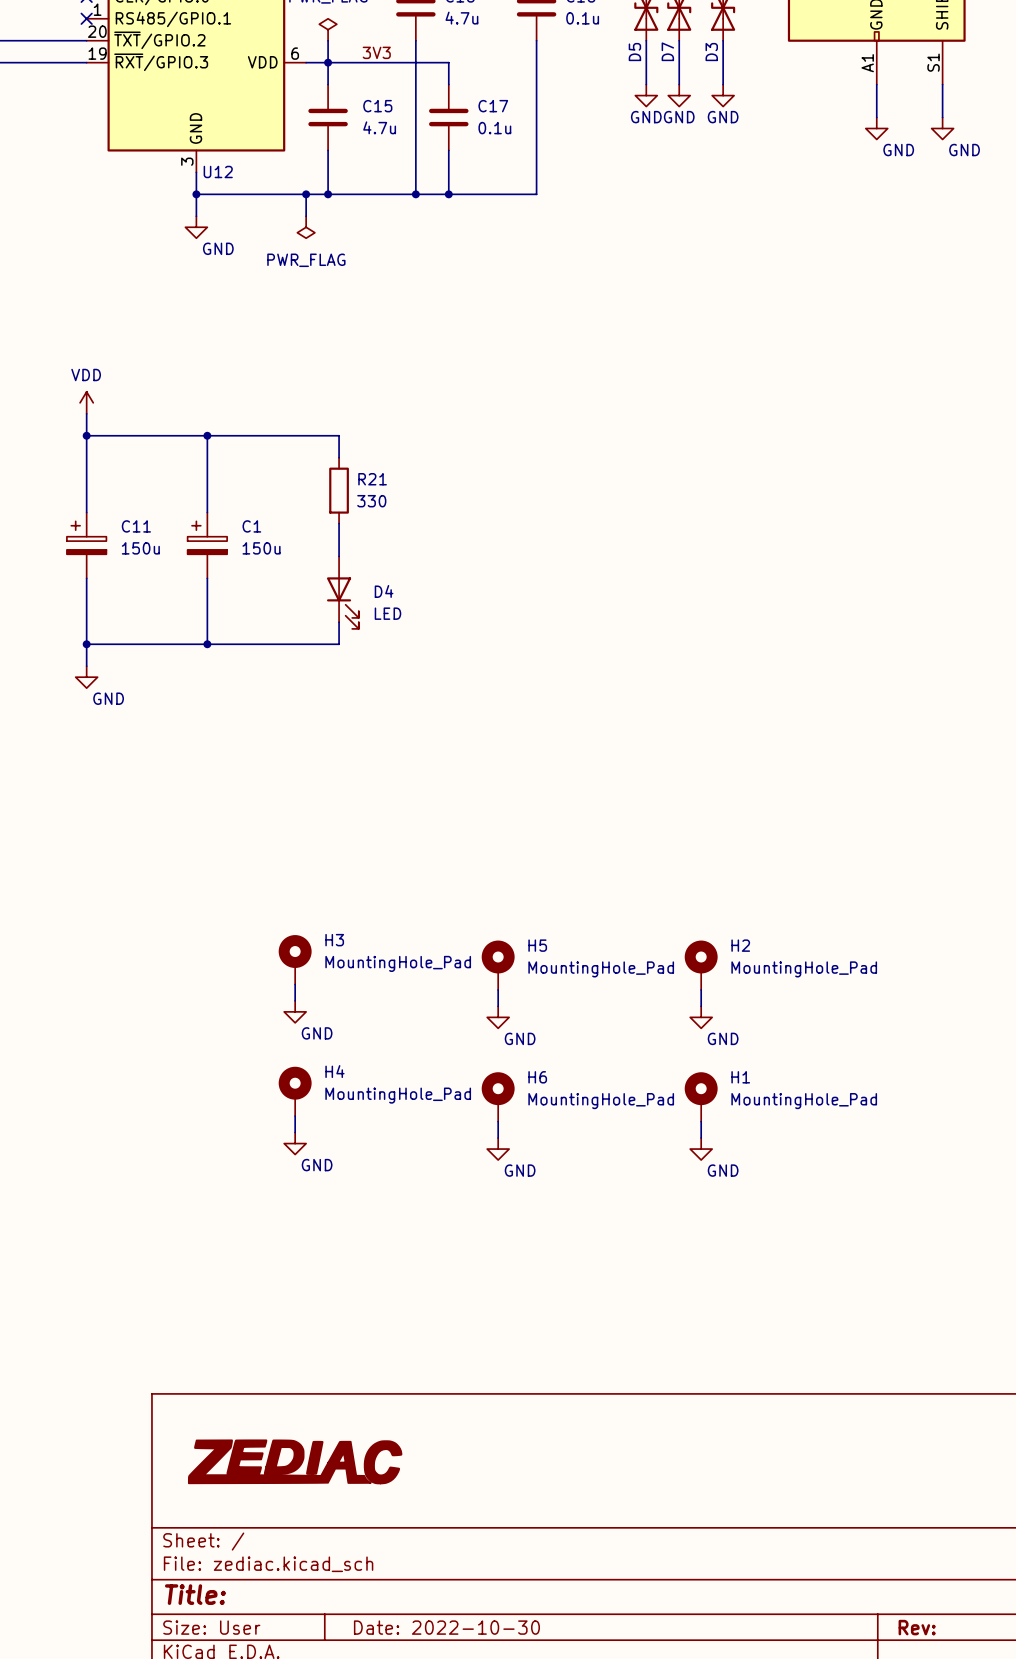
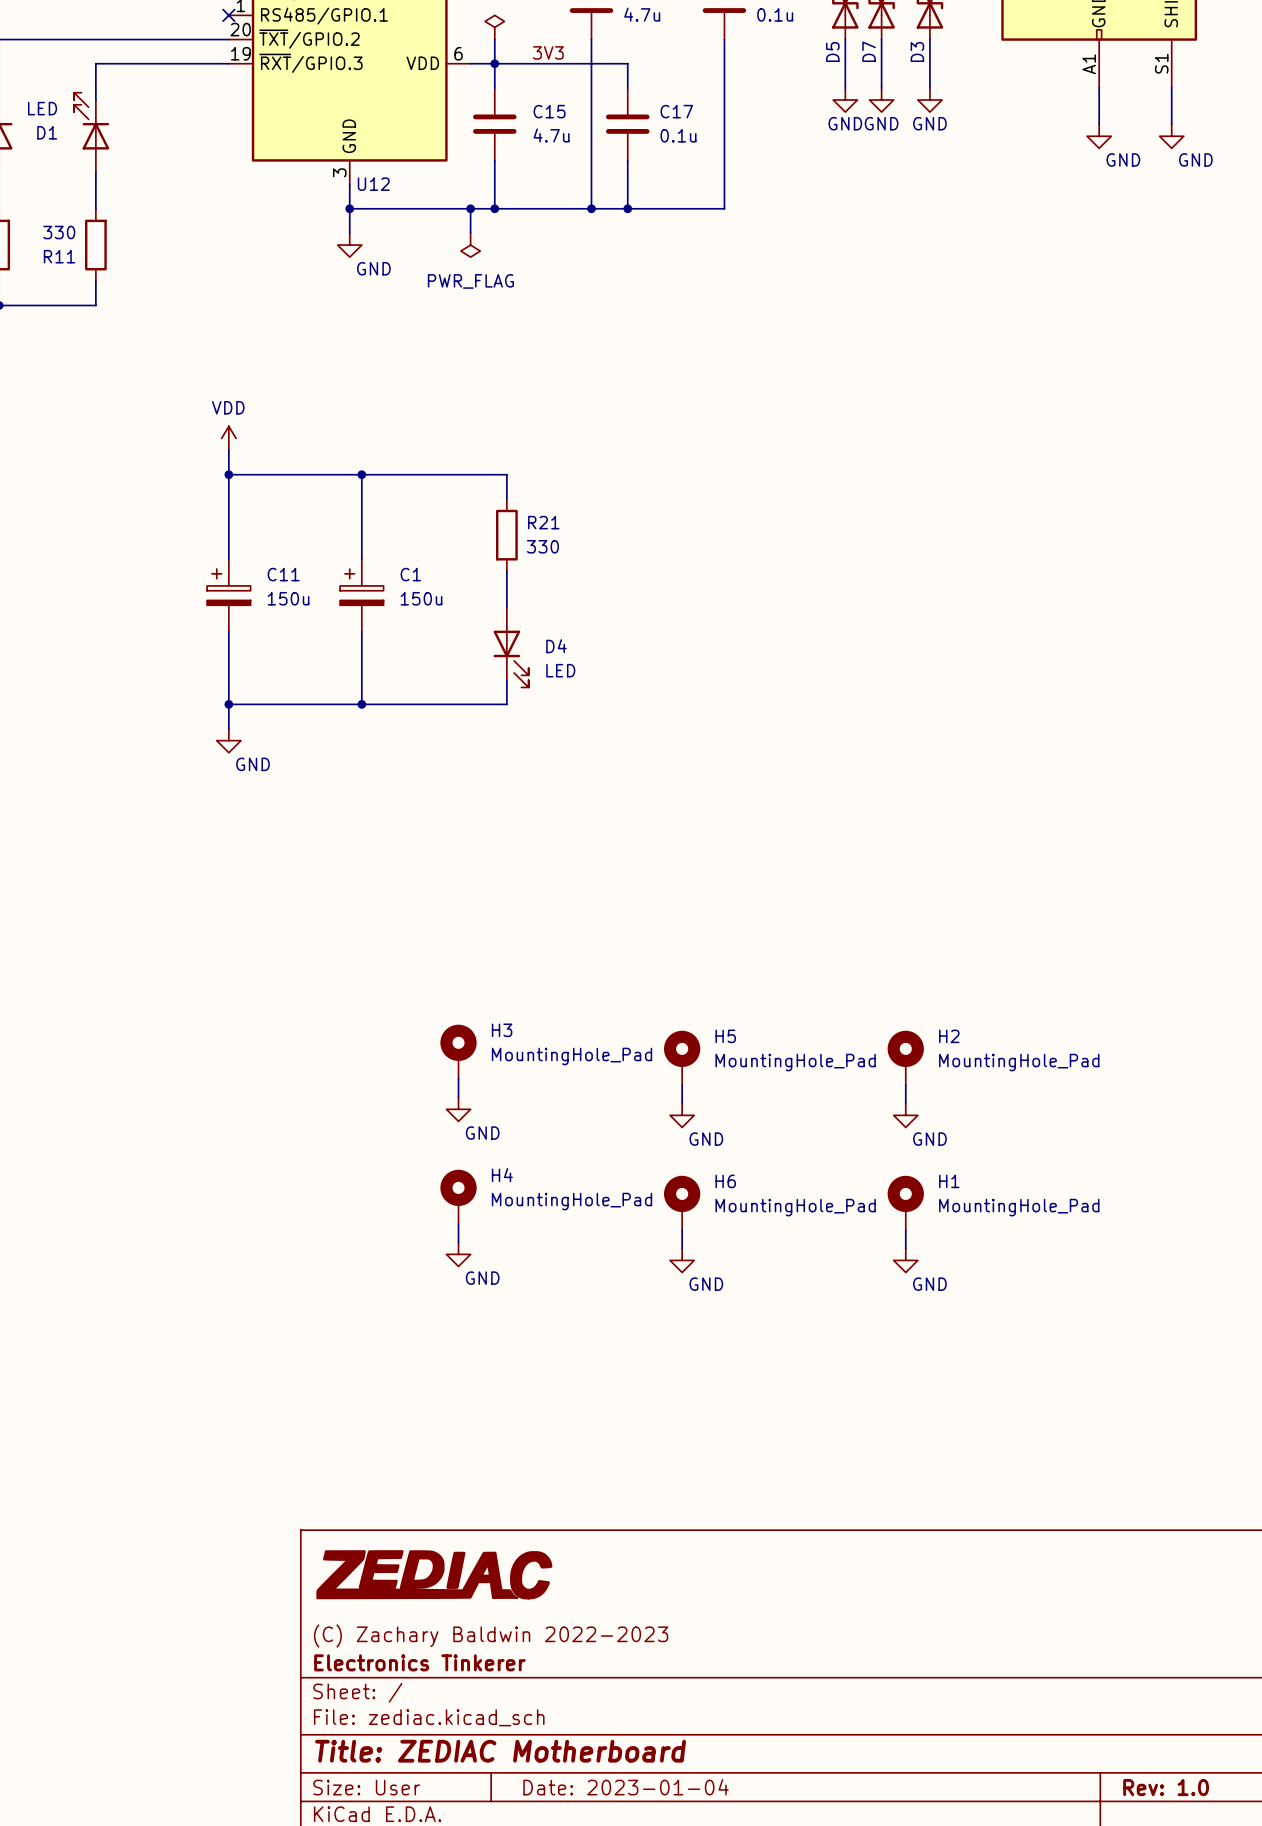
part position: (295, 1461) -> (434, 1574)
title block: none -> (C) Zachary Baldwin 2022-2023 (491, 1636)
title block: none -> Electronics Tinkerer (419, 1662)
title block: Title: (195, 1594) -> Title: ZEDIAC Motherboard (500, 1751)
title block: Date: 2022-10-30 (446, 1627) -> Date: 2023-01-04 (626, 1787)
title block: Rev: (917, 1627) -> Rev: 1.0 (1166, 1787)

